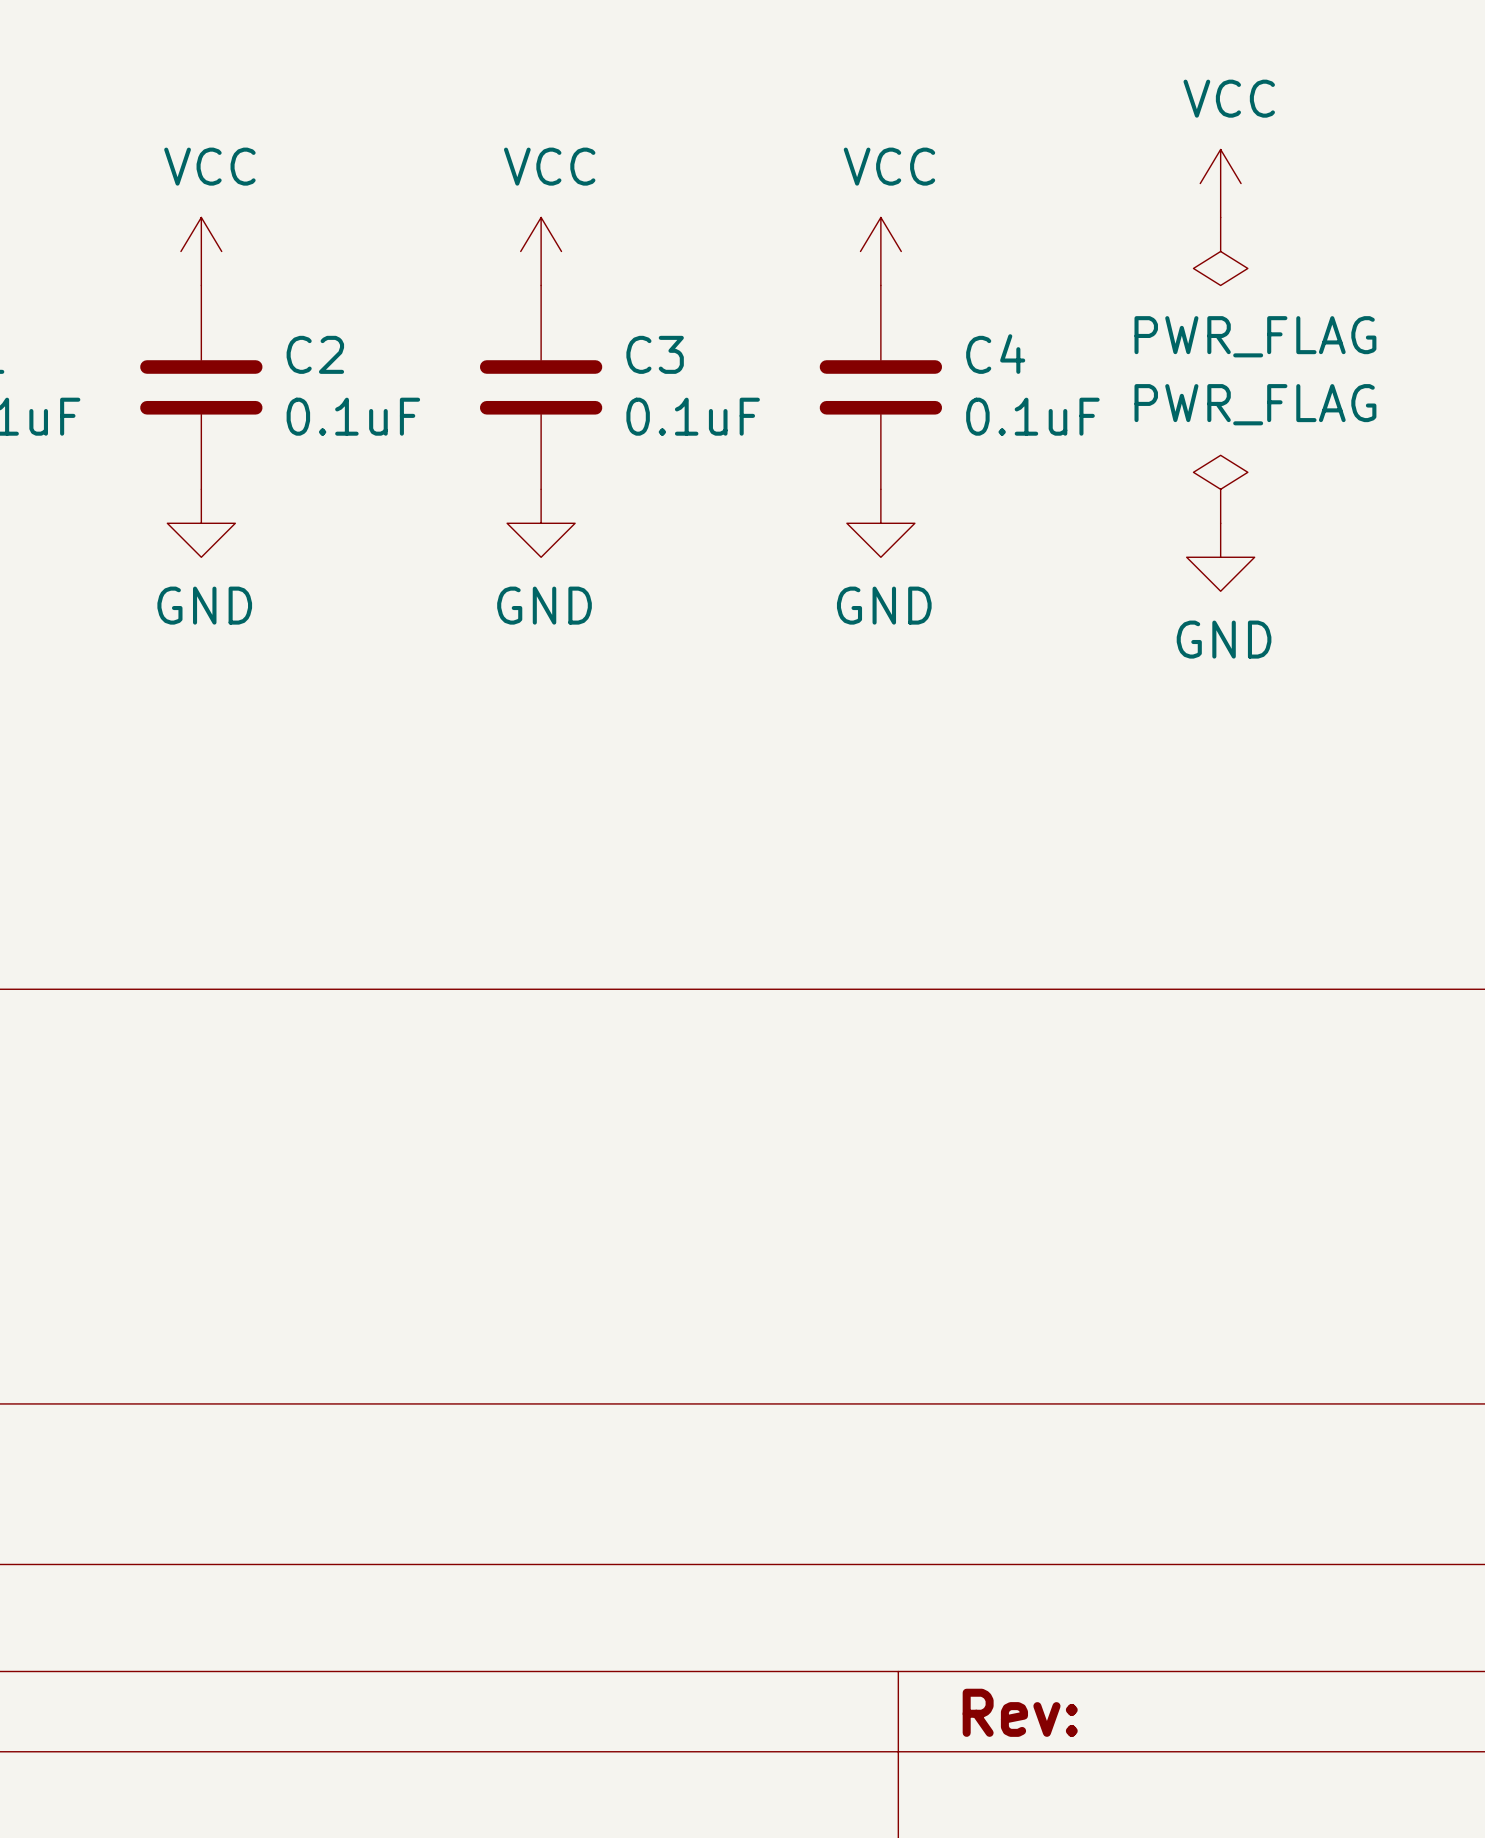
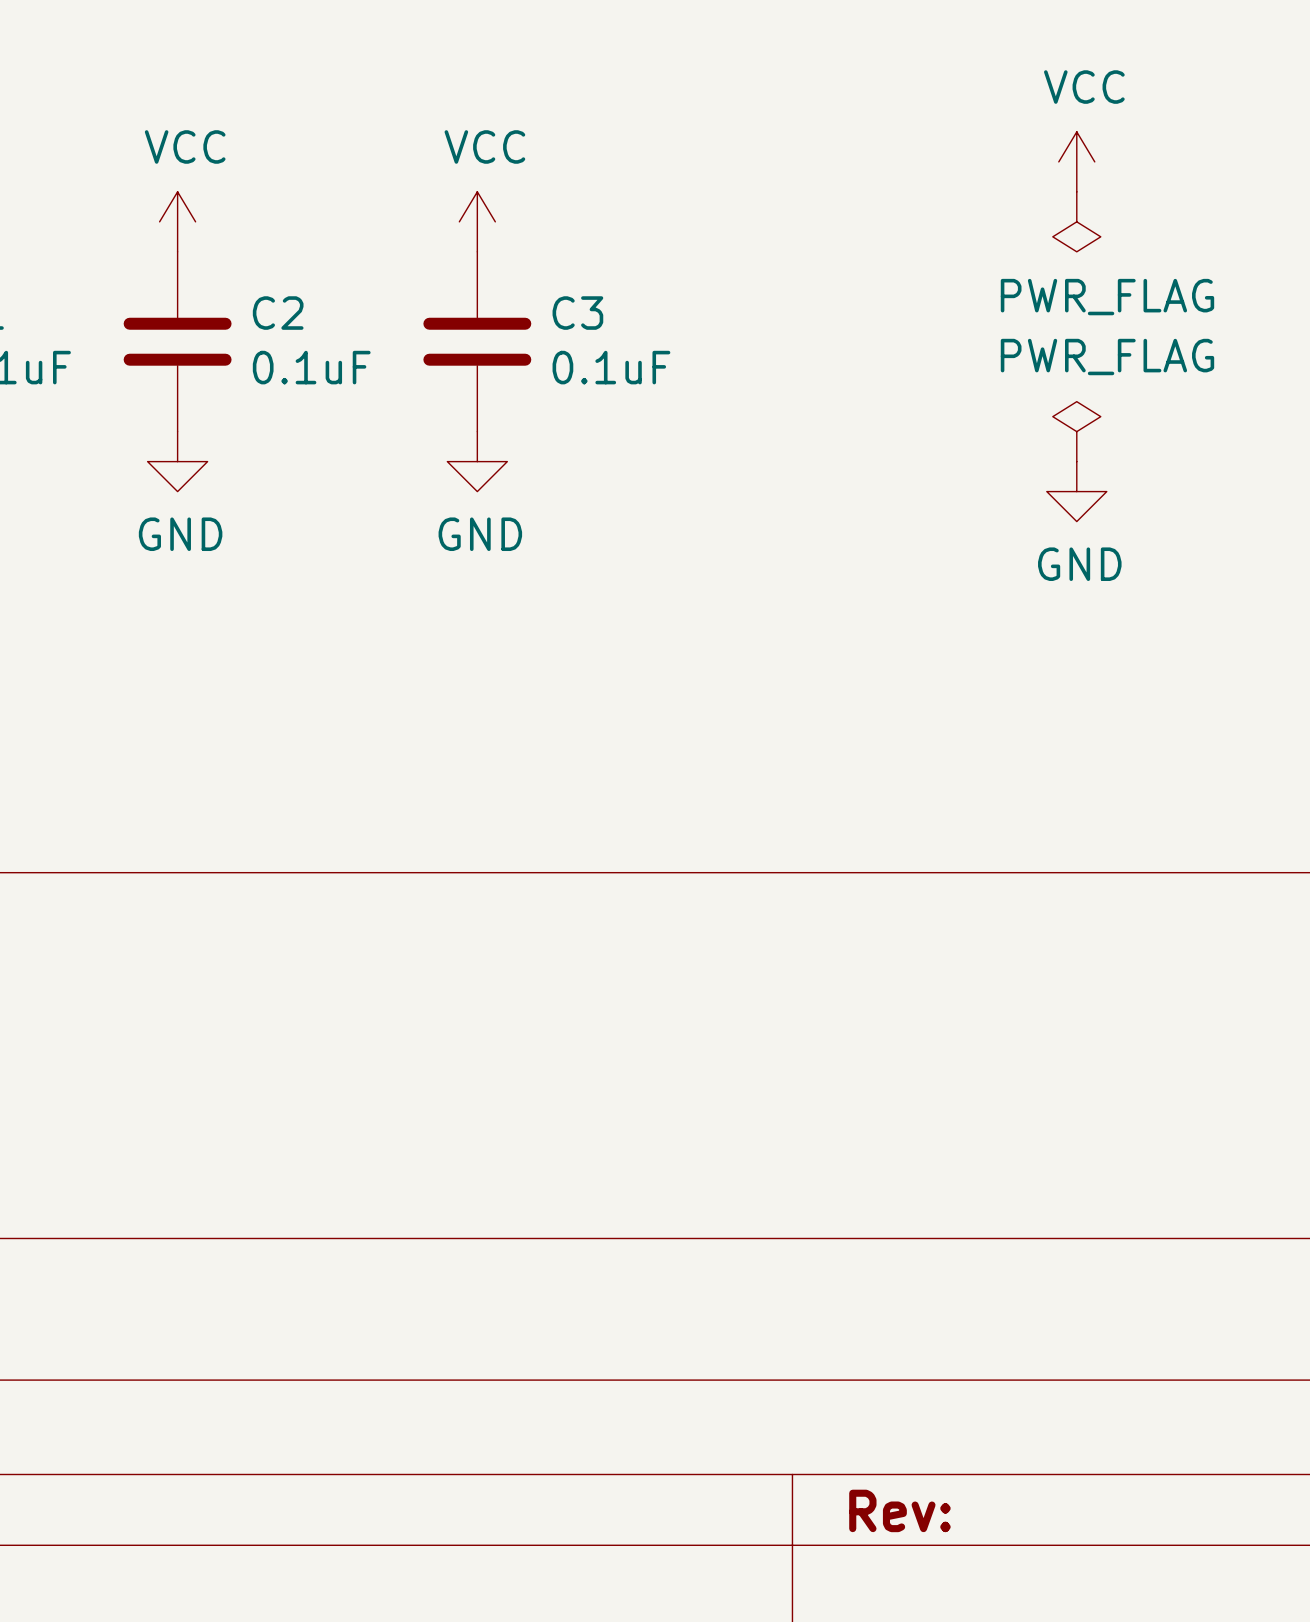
power symbol: VCC (880, 251) -> none
C4: 0.1uF (880, 387) -> none
power symbol: GND (880, 523) -> none

